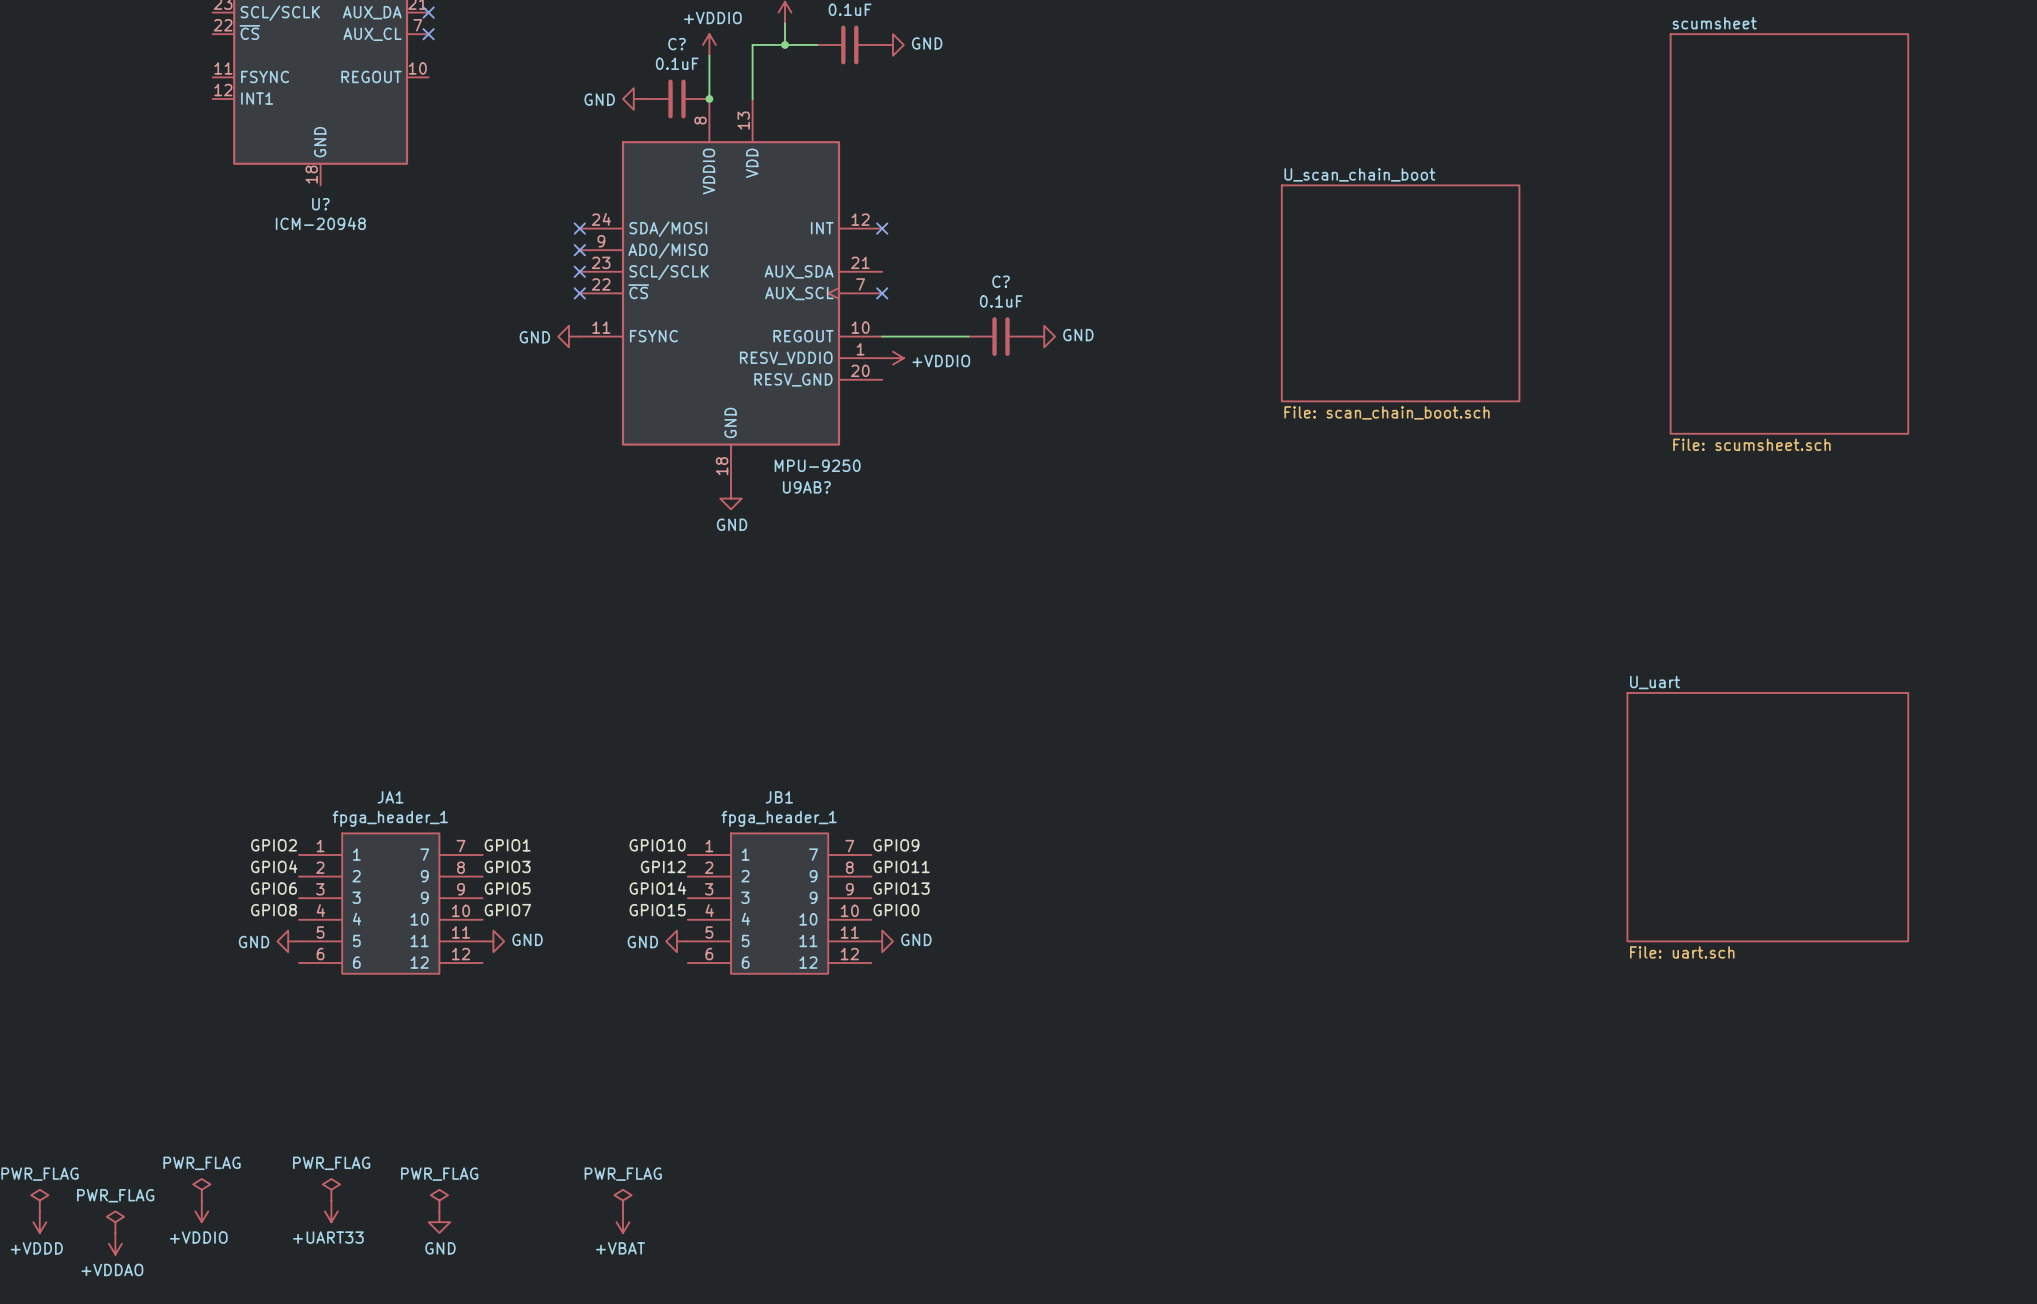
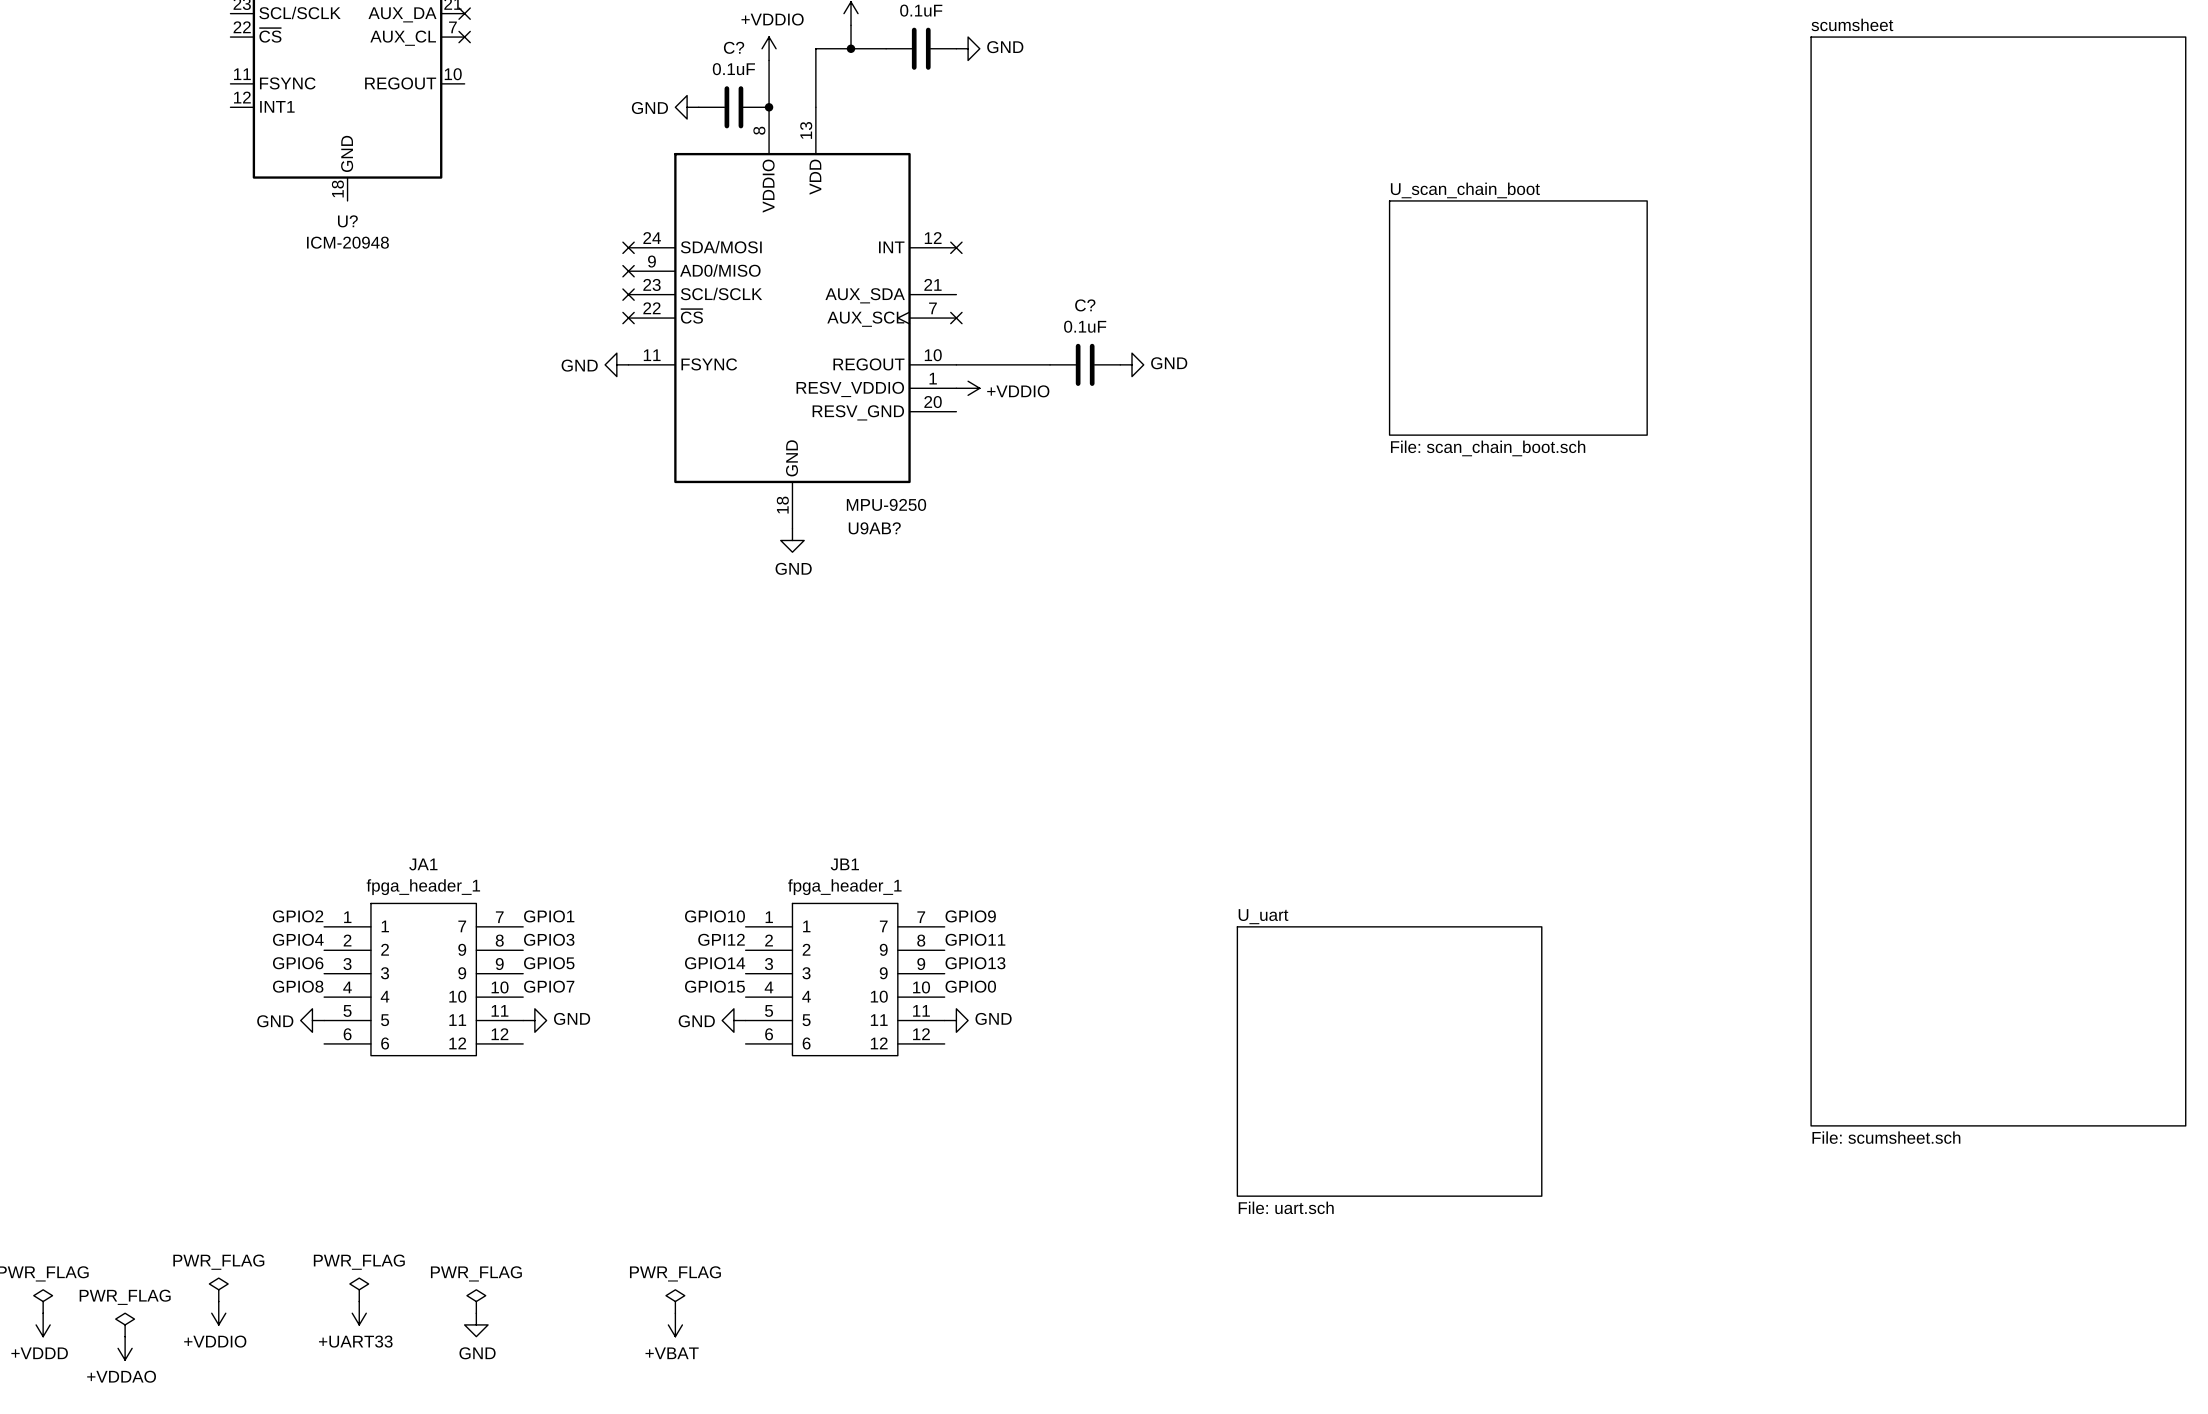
sheet scumsheet: File: scumsheet.sch (1789, 233) -> none
sheet scumsheet: none -> File: scumsheet.sch (1998, 581)
sheet U_uart: File: uart.sch (1767, 817) -> none
sheet U_uart: none -> File: uart.sch (1389, 1061)

